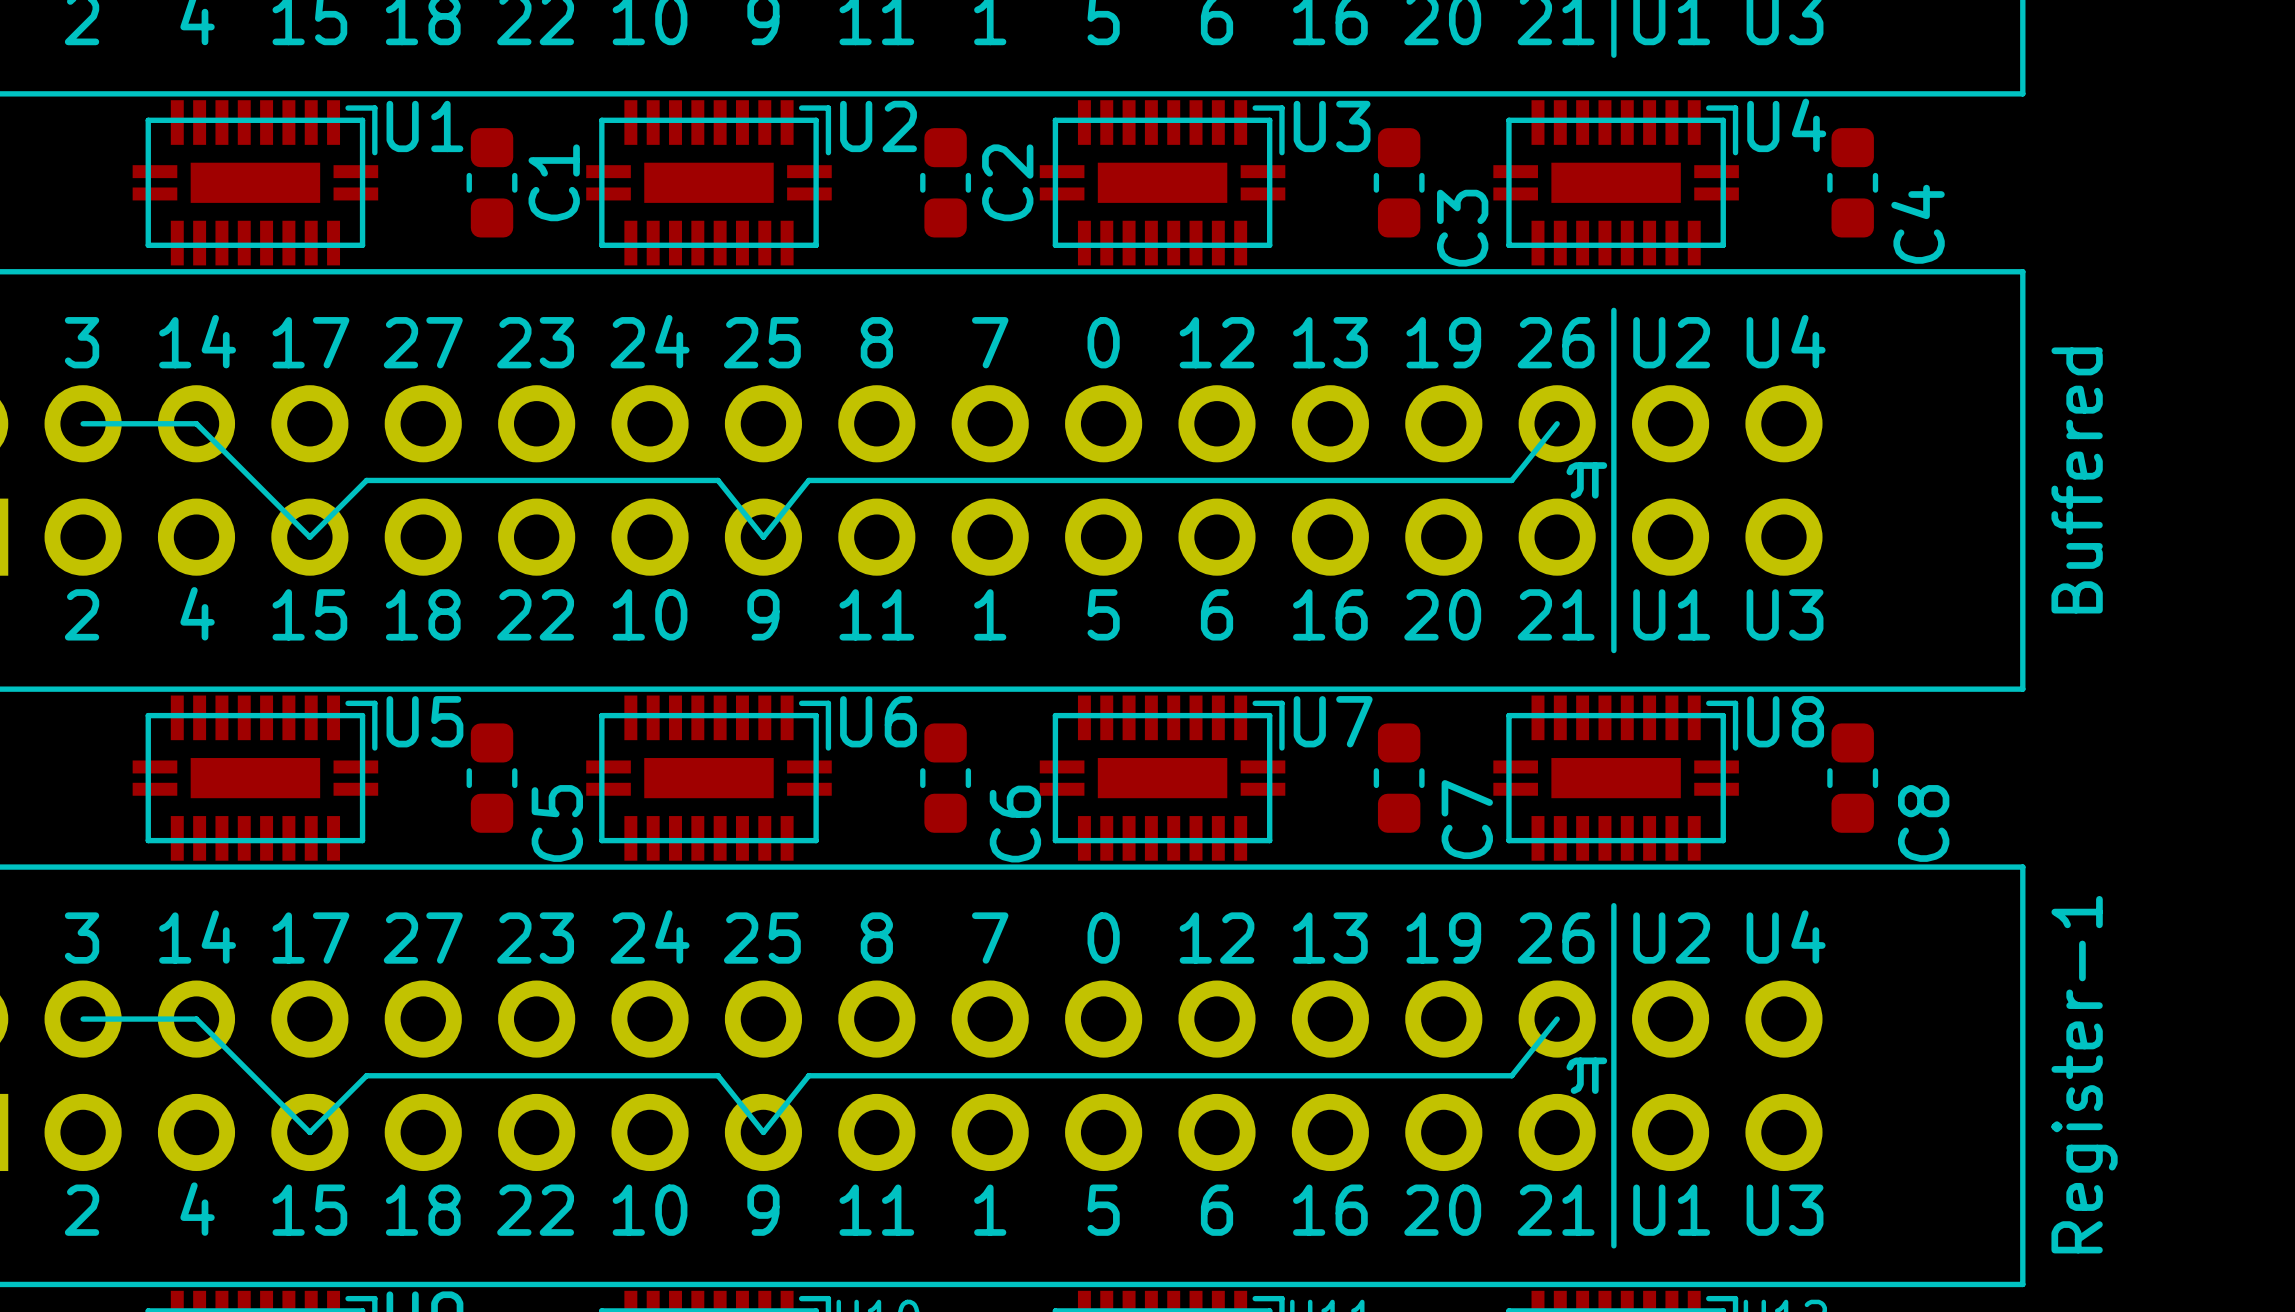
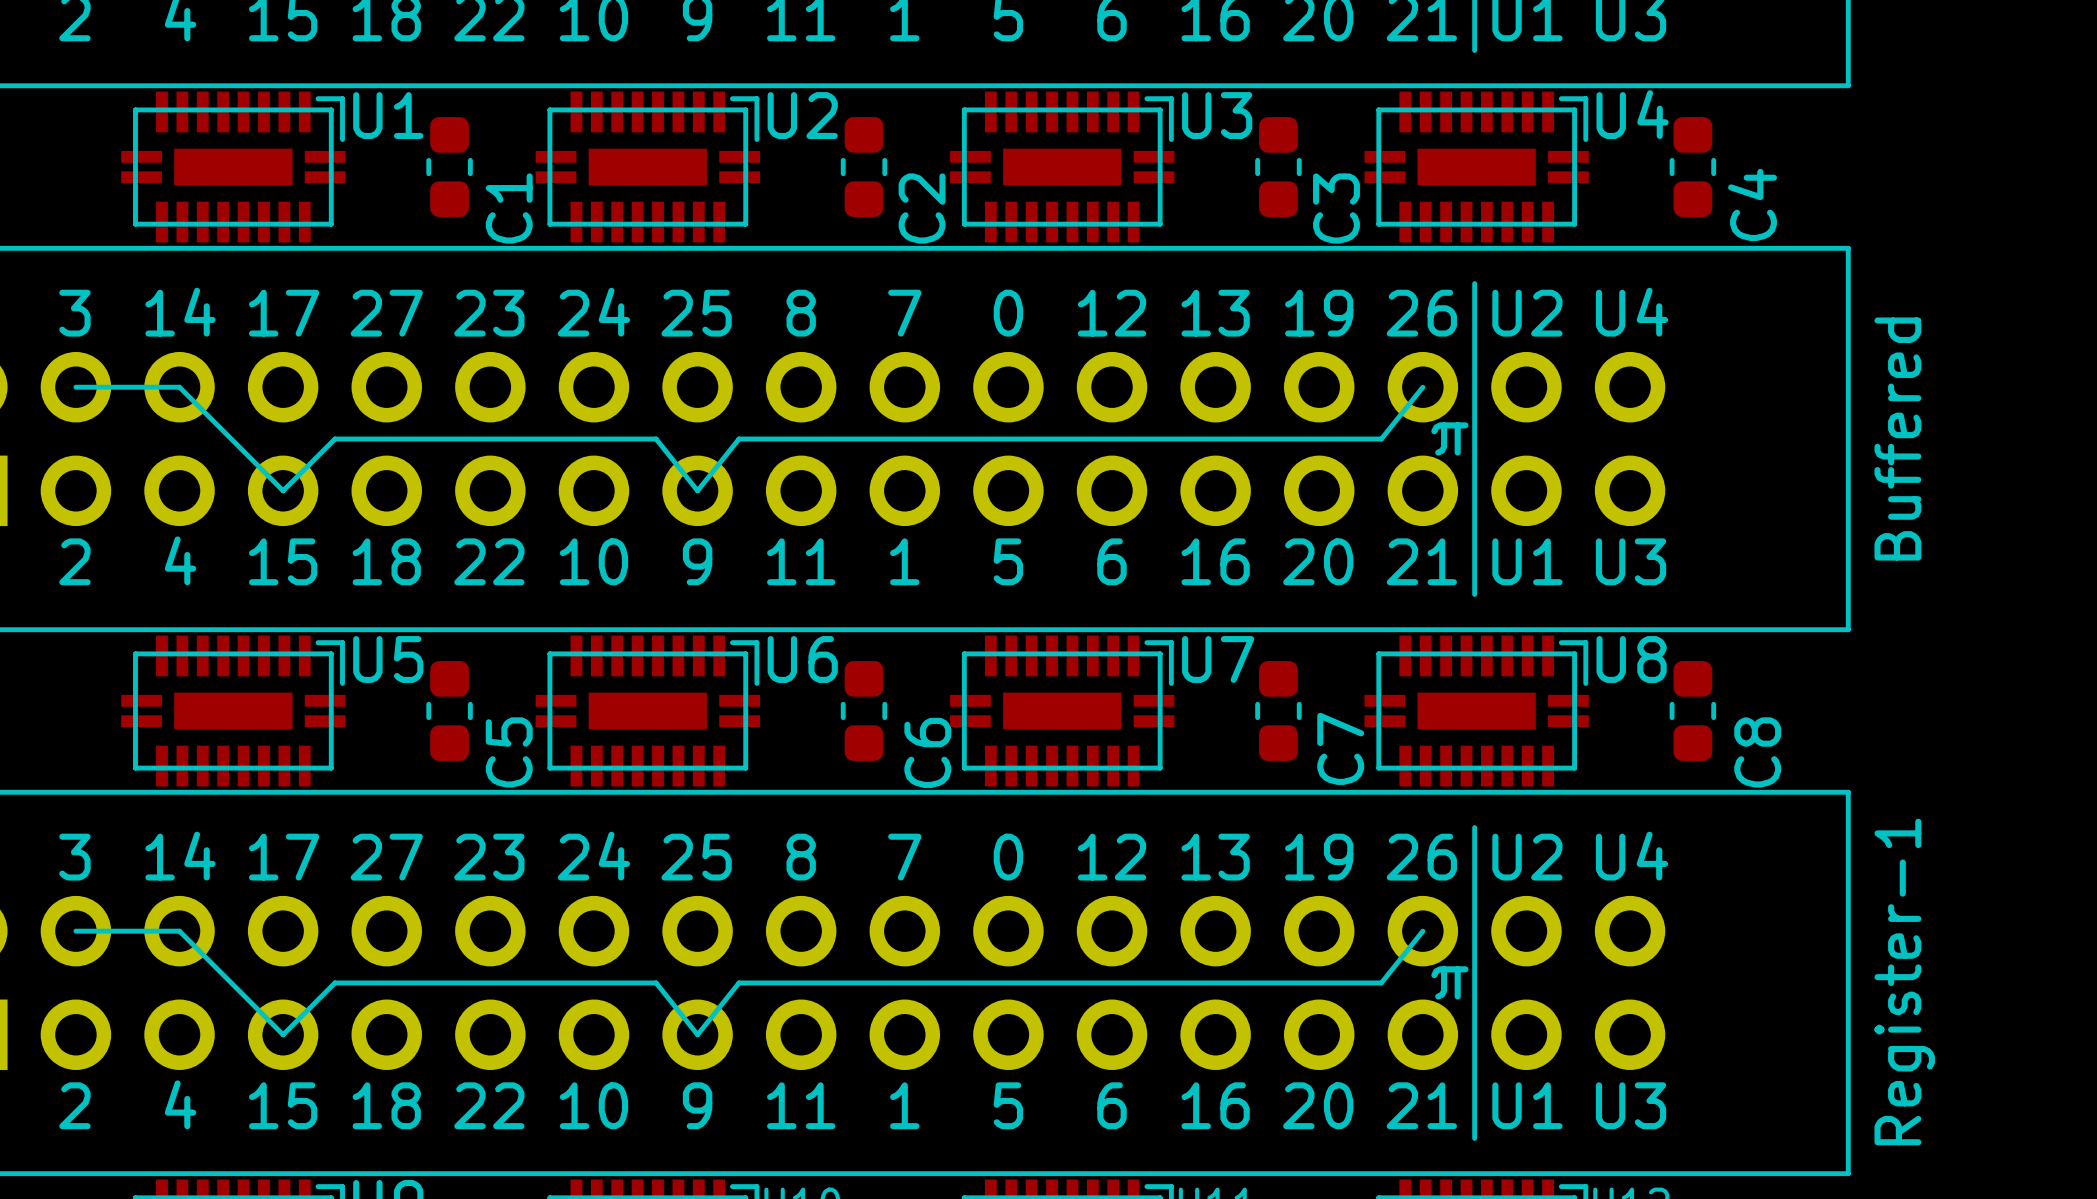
C1 name position: C1 (554, 182) -> C1 (509, 208)
C2 name position: C2 (1007, 182) -> C2 (922, 208)

